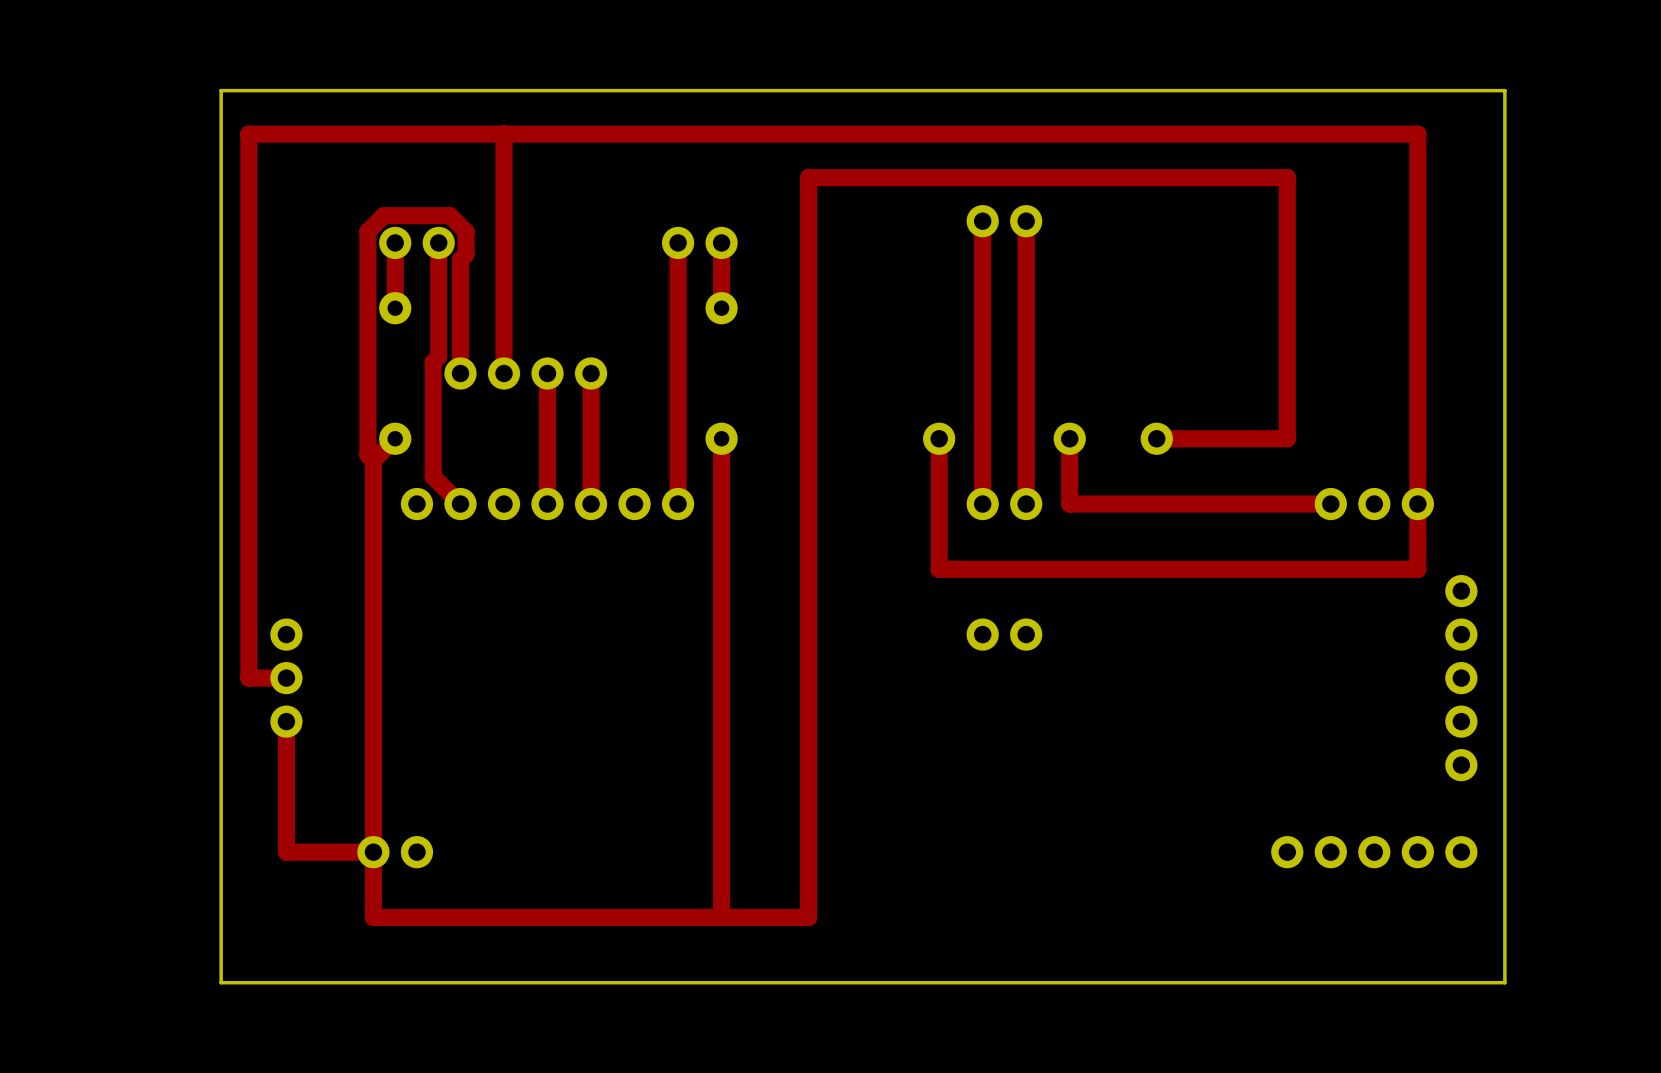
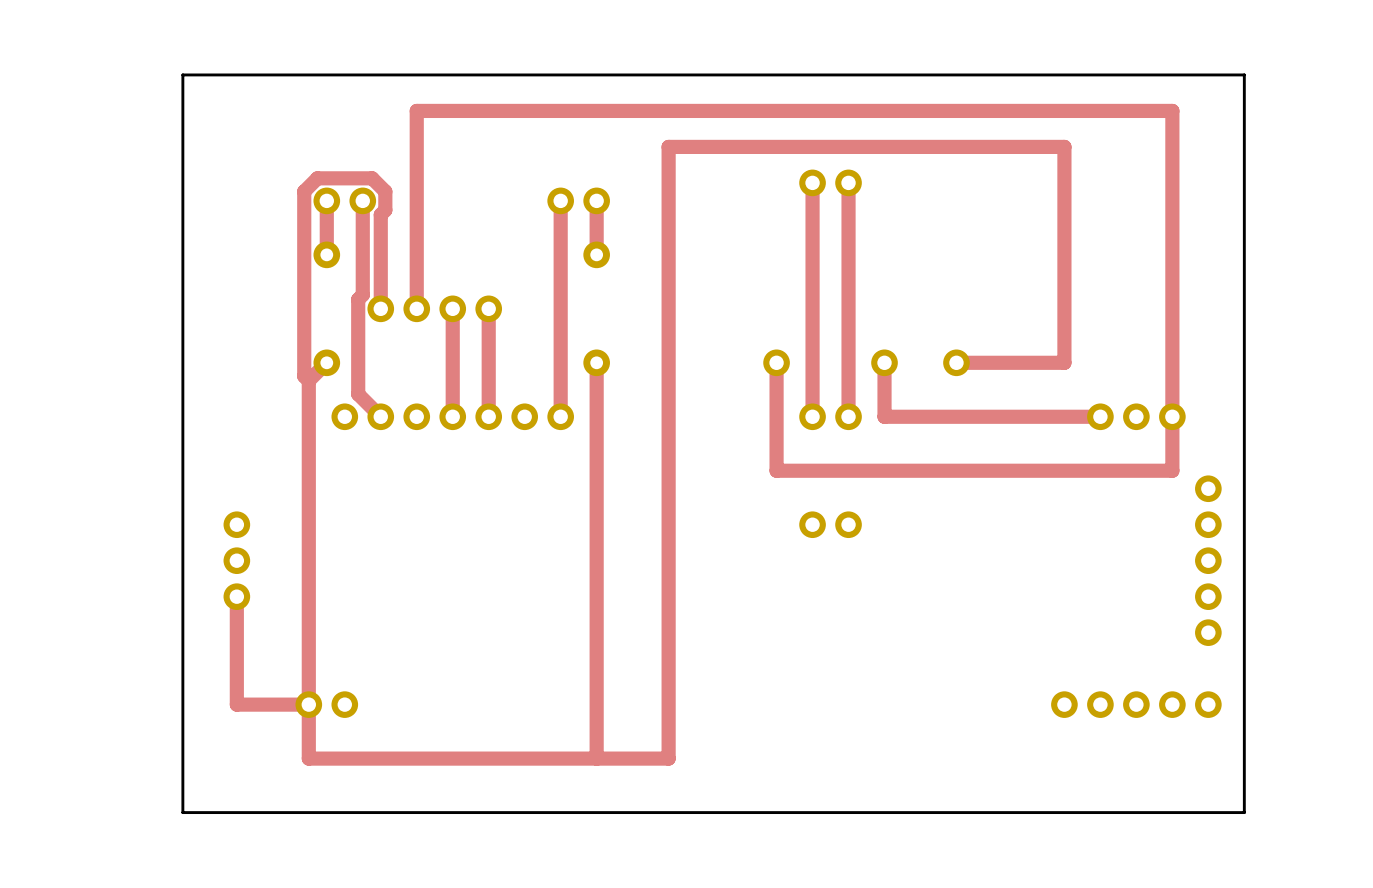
top track: (504, 134) (248, 134) (248, 678) (286, 678) -> none

